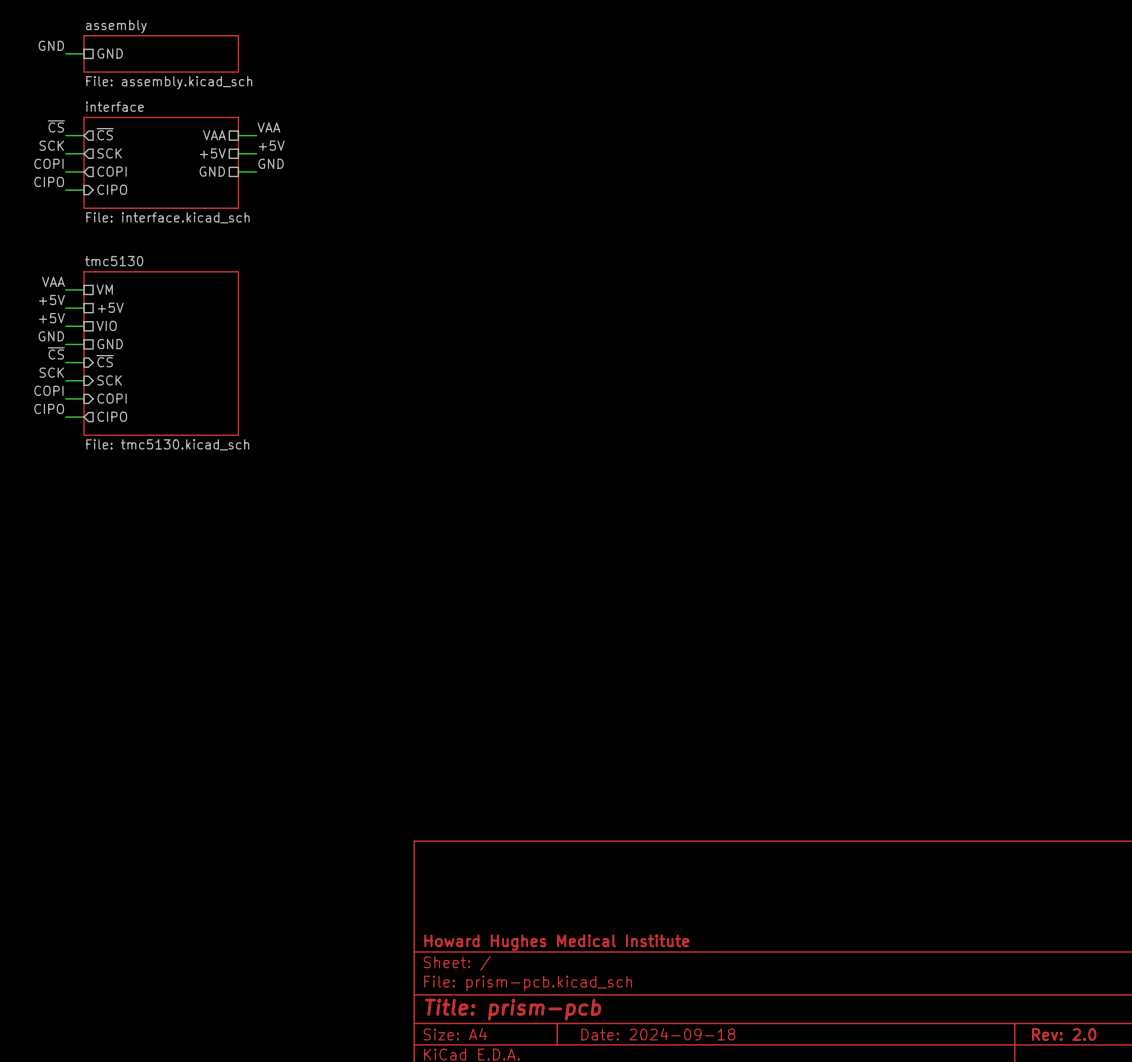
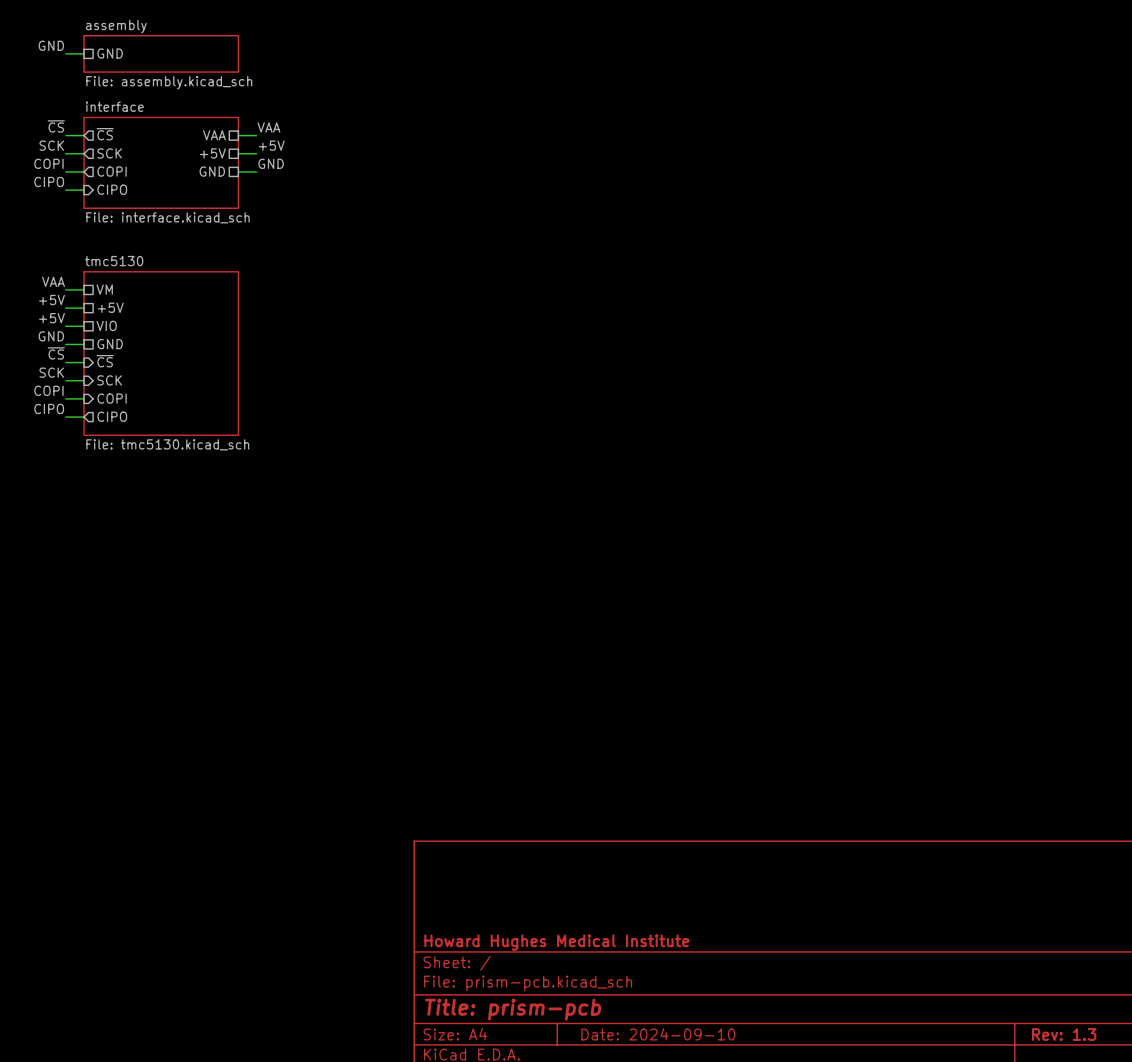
title block: Date: 2024-09-18 (658, 1034) -> Date: 2024-09-10 (658, 1034)
title block: Rev: 2.0 (1064, 1034) -> Rev: 1.3 (1064, 1034)

